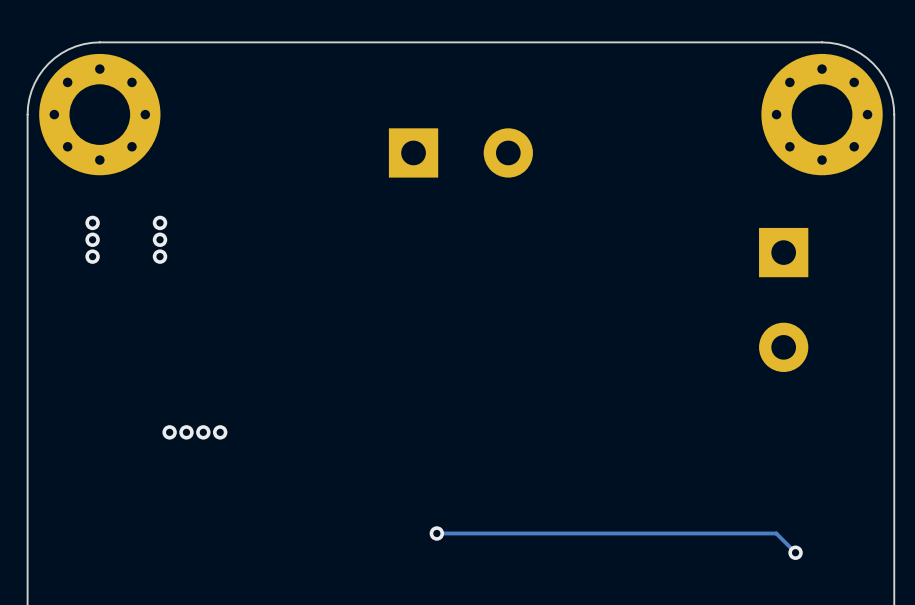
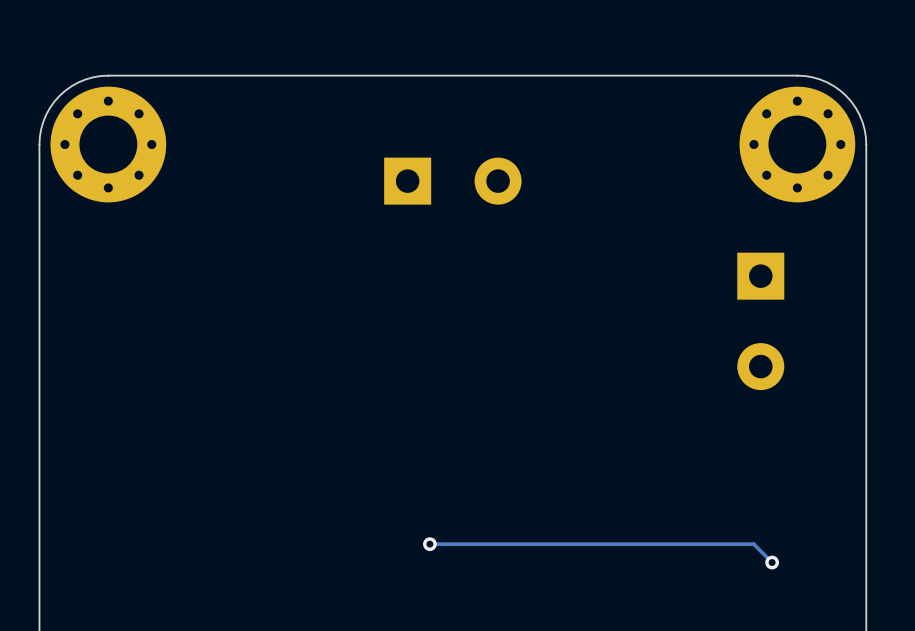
via: (92, 222) -> none
via: (160, 222) -> none
via: (92, 239) -> none
via: (160, 239) -> none
via: (92, 256) -> none
via: (160, 256) -> none
via: (169, 432) -> none
via: (186, 432) -> none
via: (203, 432) -> none
via: (220, 432) -> none

